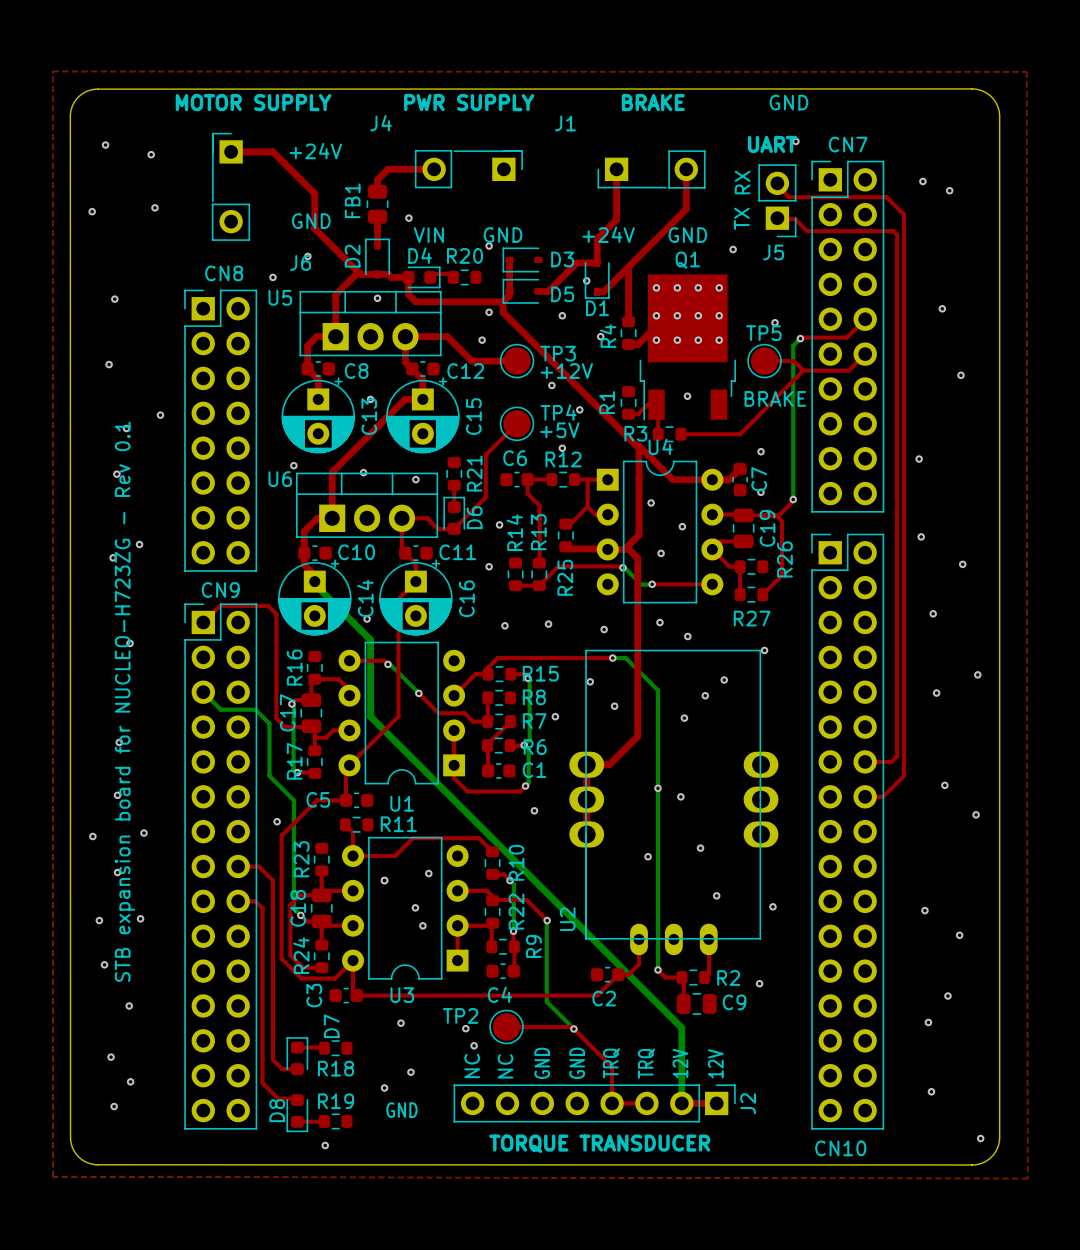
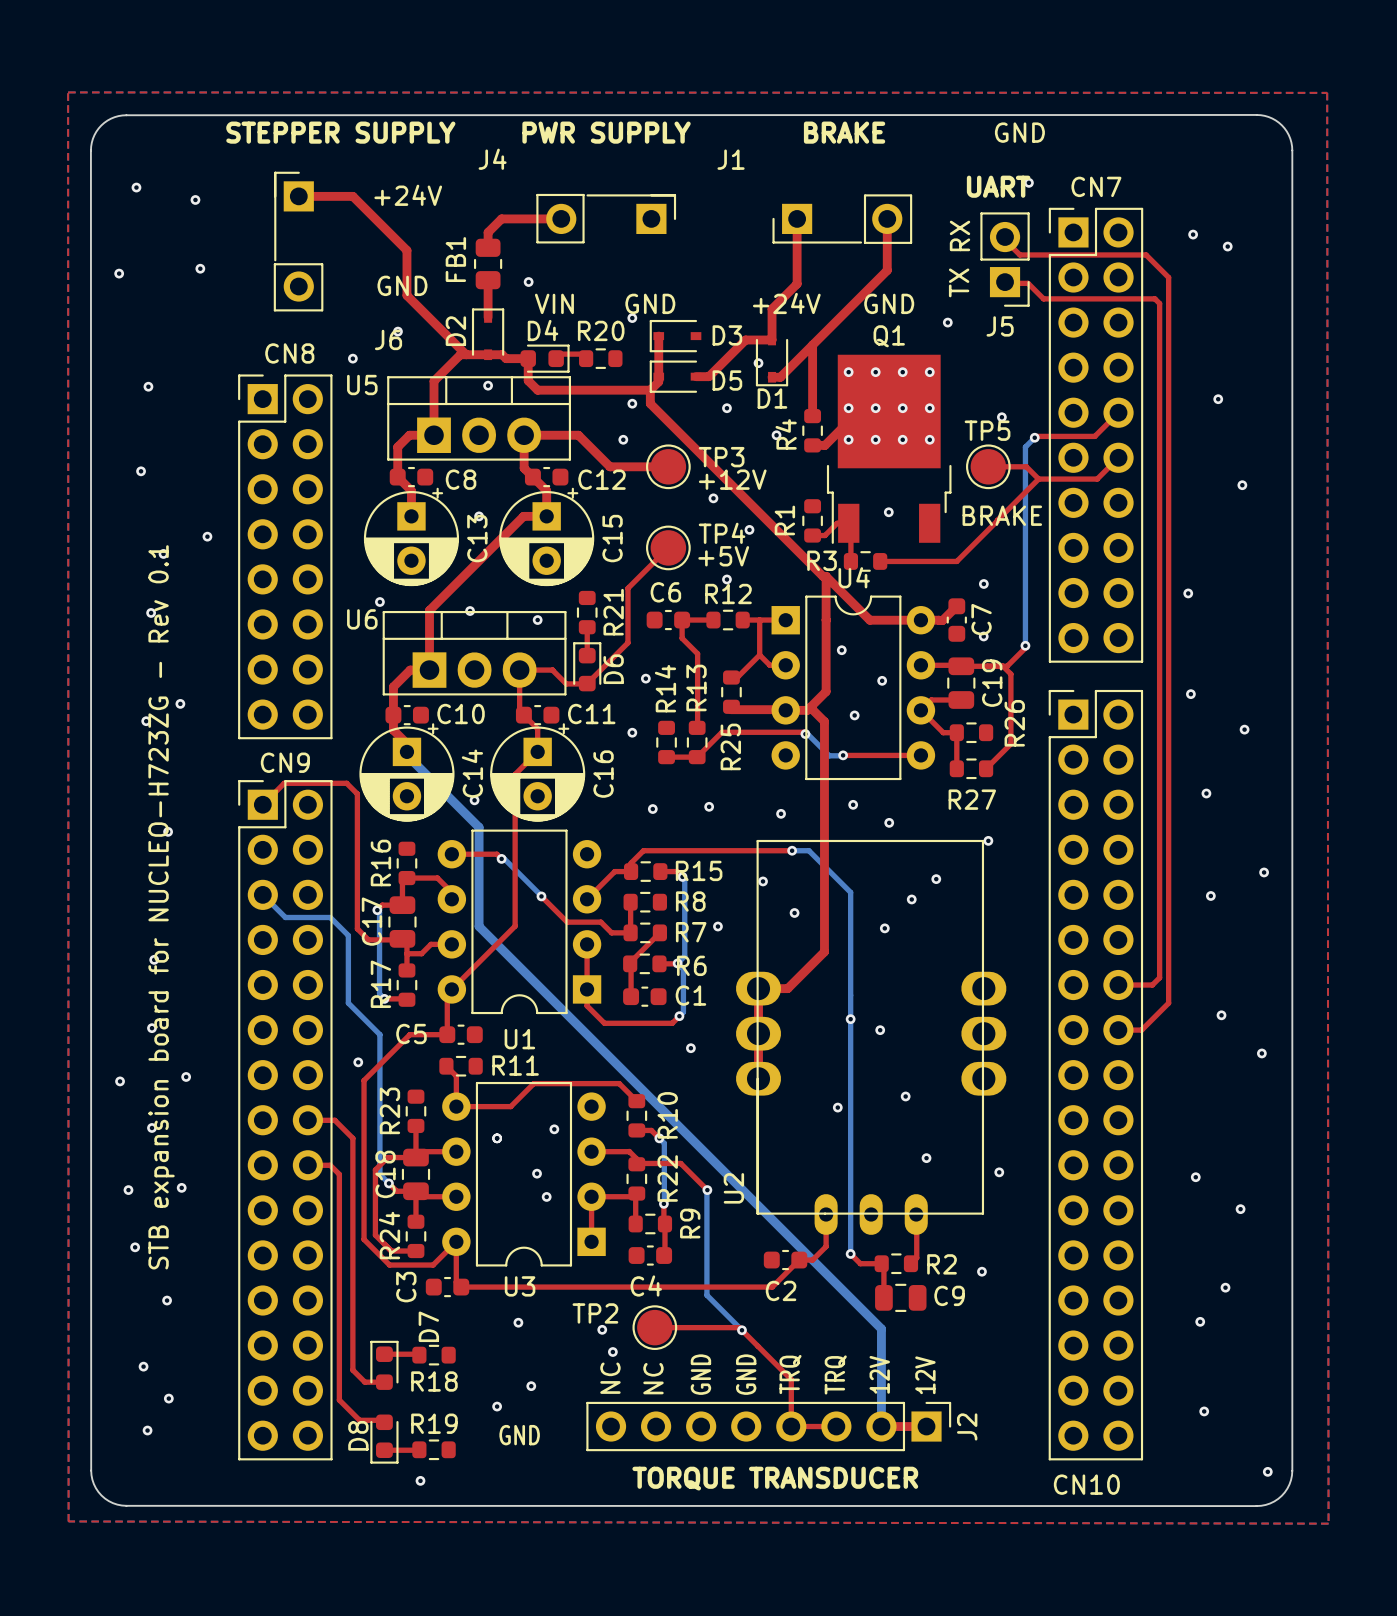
text: MOTOR SUPPLY (253, 102) -> STEPPER SUPPLY (340, 132)

